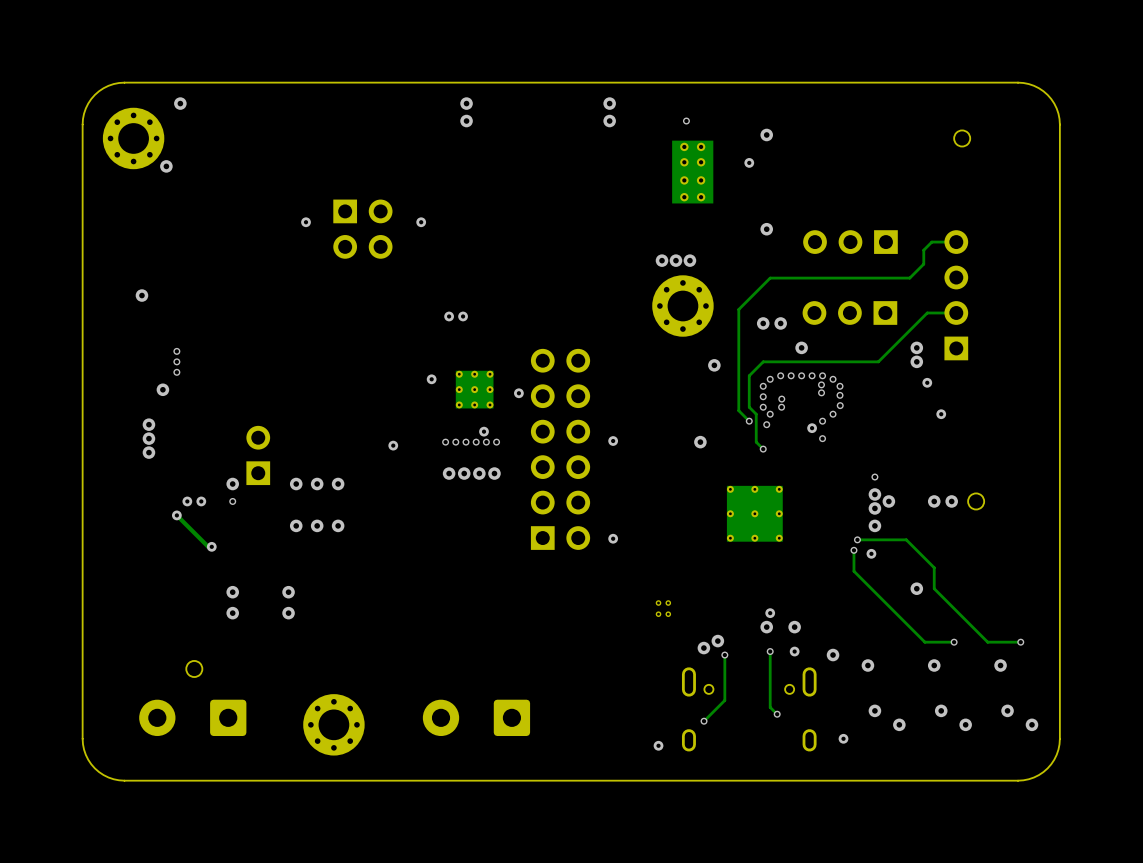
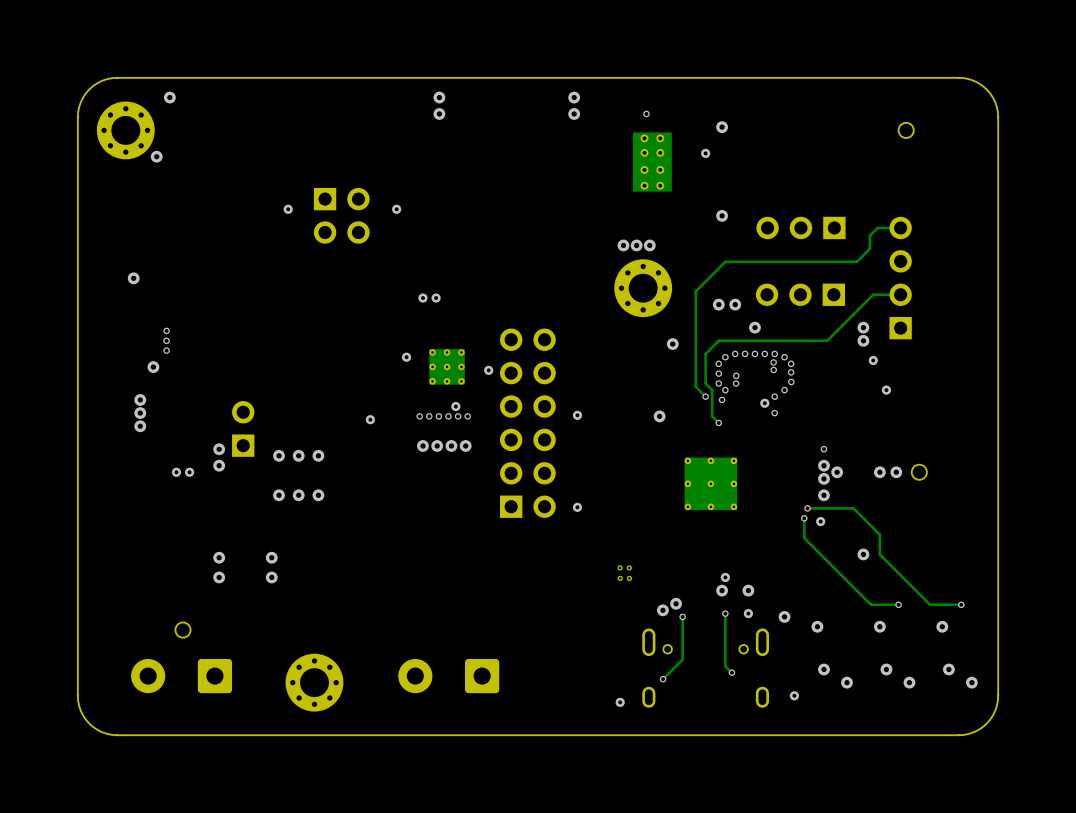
via: none -> (219, 449)
via: (232, 484) -> none
via: none -> (219, 465)
via: (232, 501) -> none
track: (176, 515) (208, 546) (211, 546) -> none
via: (176, 515) -> none
via: (211, 546) -> none

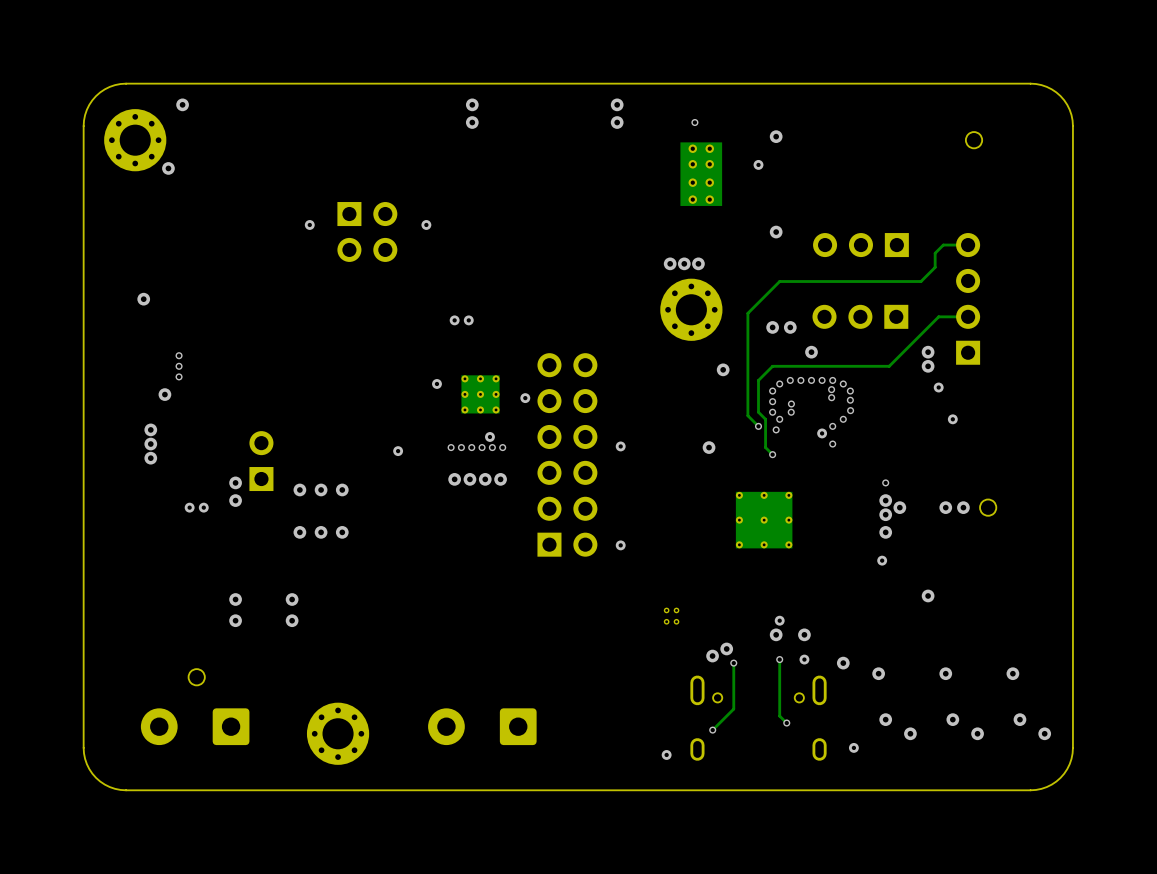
track: (807, 508) (853, 508) (879, 534) (879, 554) (930, 604) (961, 604) -> none
via: (807, 508) -> none
track: (804, 518) (804, 538) (871, 604) (898, 604) -> none
via: (804, 518) -> none
via: (898, 604) -> none
via: (961, 604) -> none

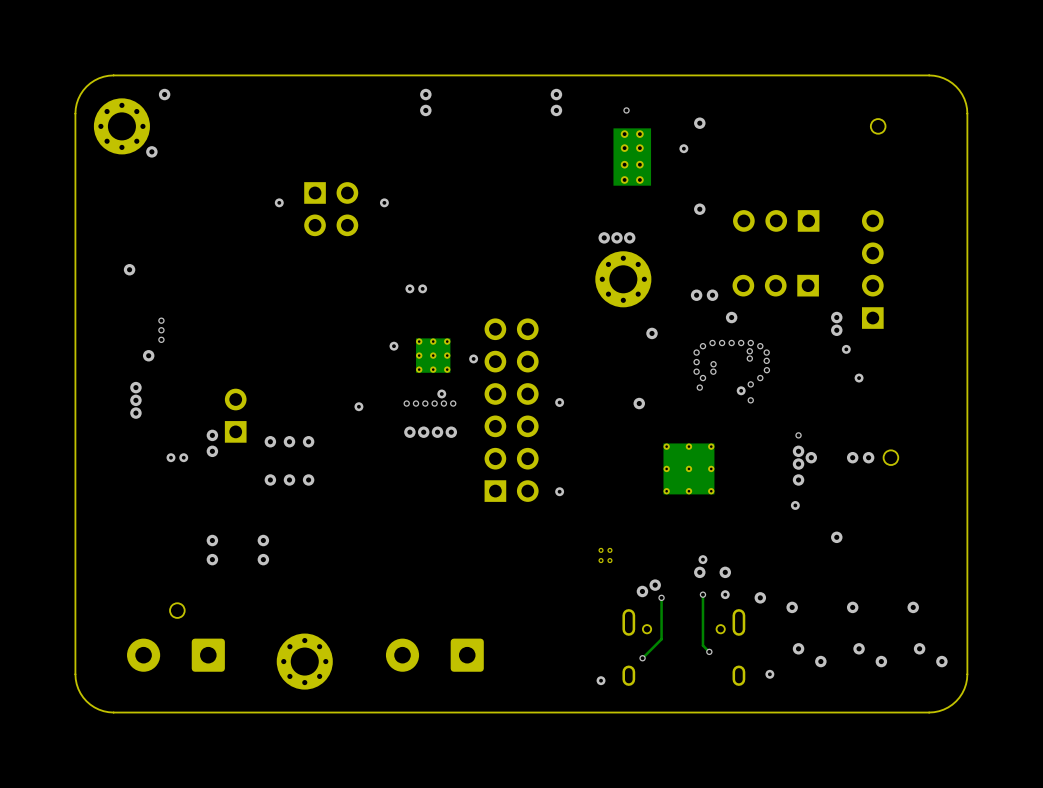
track: (968, 245) (943, 245) (935, 253) (935, 267) (921, 281) (779, 281) (747, 313) (747, 415) (758, 426) -> none
track: (968, 316) (938, 316) (889, 366) (772, 366) (758, 380) (758, 412) (765, 419) (765, 447) (772, 454) -> none
via: (758, 426) -> none
via: (772, 454) -> none

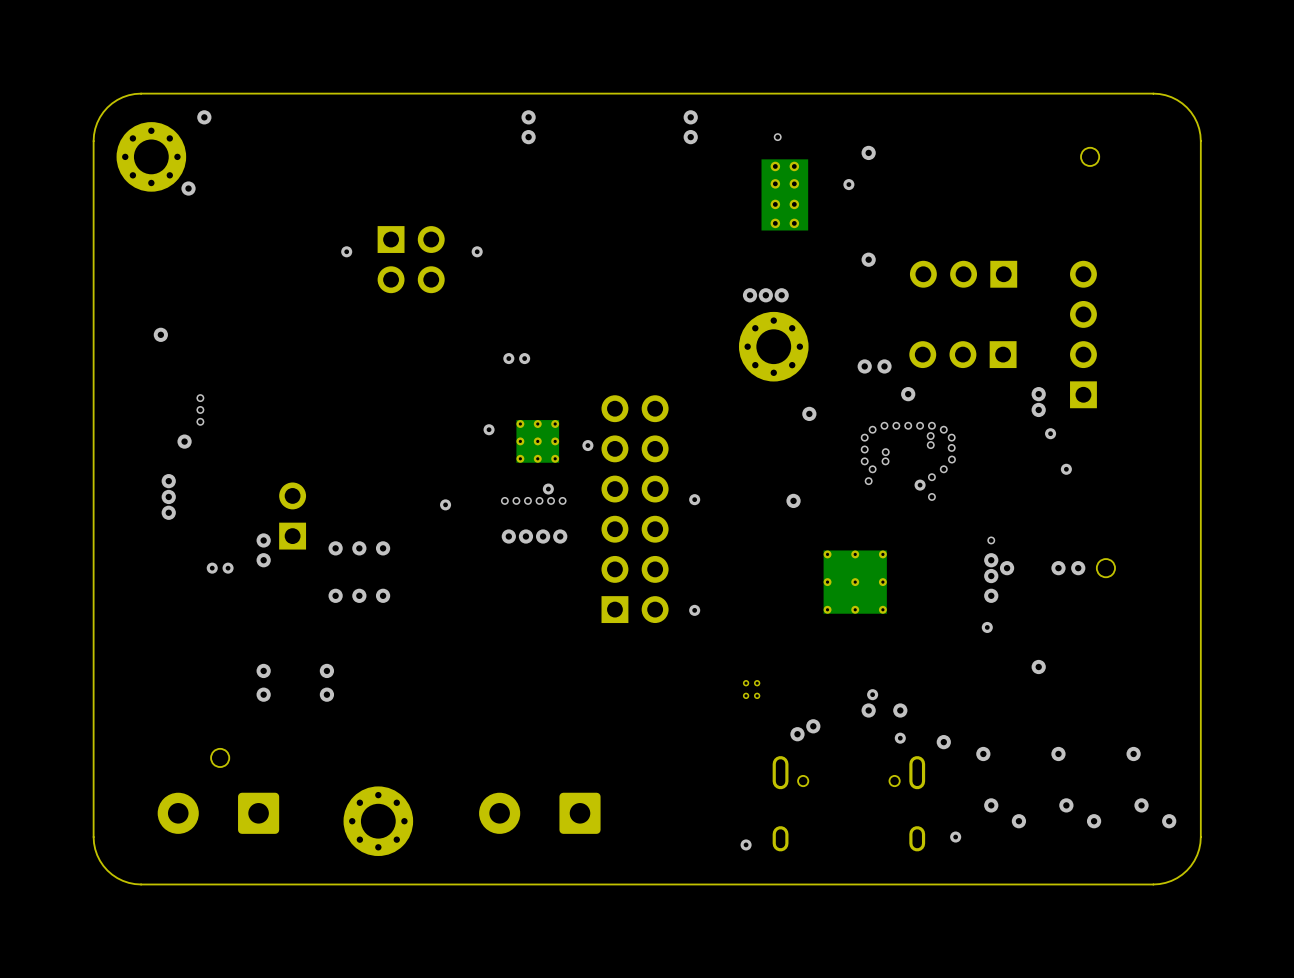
track: (702, 594) (702, 645) (709, 651) -> none
via: (702, 594) -> none
track: (661, 597) (661, 639) (642, 658) -> none
via: (661, 597) -> none
via: (709, 651) -> none
via: (642, 658) -> none

